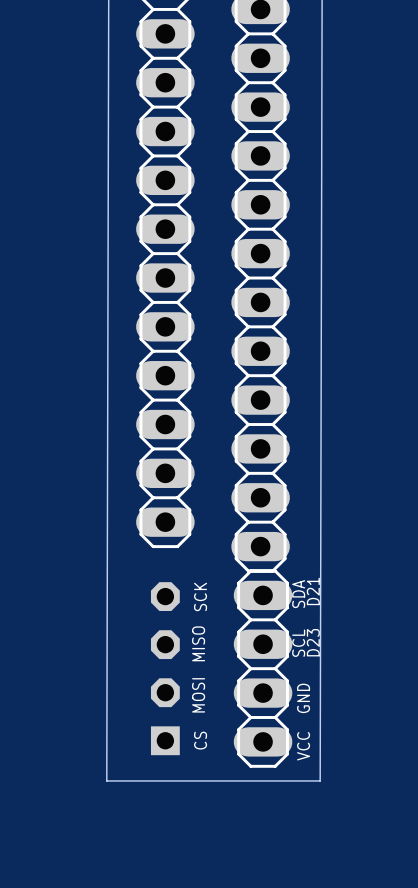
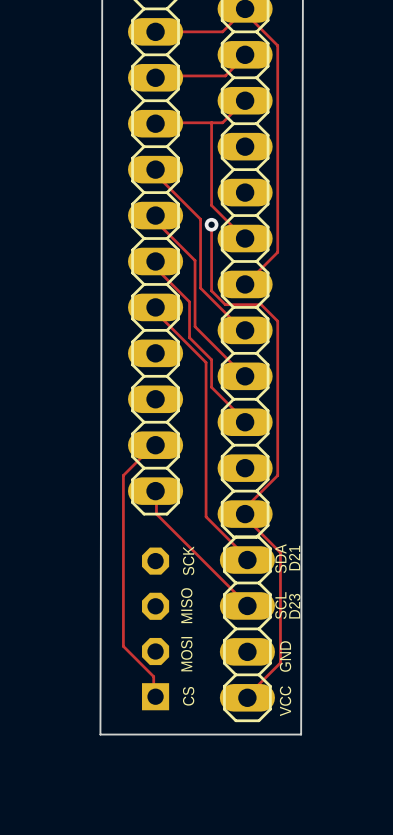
track: none -> (155, 31) (222, 31) (245, 8) (247, 9) (247, 15) (277, 45) (277, 252) (245, 284)
track: none -> (245, 54) (225, 75) (156, 75) (155, 77)
track: none -> (245, 100) (222, 122) (155, 123)
track: none -> (211, 122) (211, 205) (245, 238)
track: none -> (155, 169) (156, 175) (200, 219) (200, 288) (244, 332) (245, 330)
track: none -> (155, 215) (156, 221) (195, 260) (195, 326) (245, 376)
track: none -> (211, 224) (211, 290) (225, 304) (261, 304) (277, 321) (277, 475) (247, 505) (247, 519) (280, 552) (280, 662) (247, 697)
via: none -> (211, 224)
track: none -> (155, 261) (156, 268) (189, 301) (189, 337) (211, 359) (211, 387) (245, 422)
track: none -> (155, 307) (156, 312) (206, 362) (206, 516) (247, 560)
track: none -> (155, 445) (123, 475) (123, 646) (153, 676) (153, 695) (155, 696)
track: none -> (155, 491) (156, 514) (247, 605)

